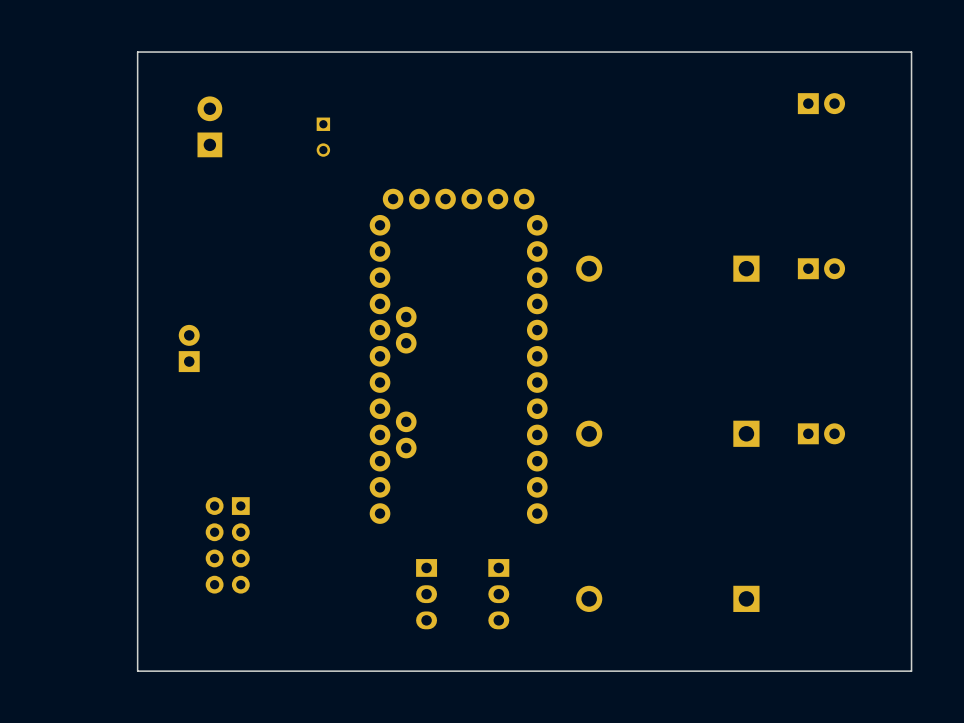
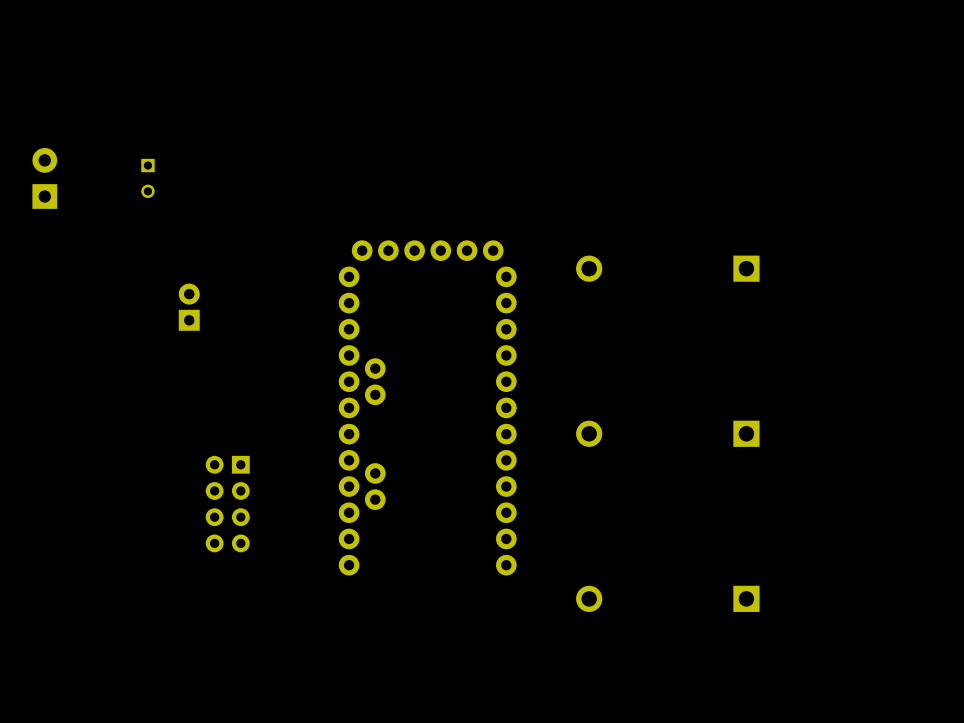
board edge: (911, 52) (137, 52) (137, 671) (911, 671) (911, 52) -> none
part: (821, 103) -> none
part position: (209, 126) -> (44, 178)
part position: (323, 137) -> (147, 178)
part: (821, 268) -> none
part position: (189, 348) -> (189, 307)
part position: (458, 356) -> (427, 407)
part: (821, 433) -> none
part position: (227, 545) -> (227, 504)
part: (426, 594) -> none
part: (498, 594) -> none

